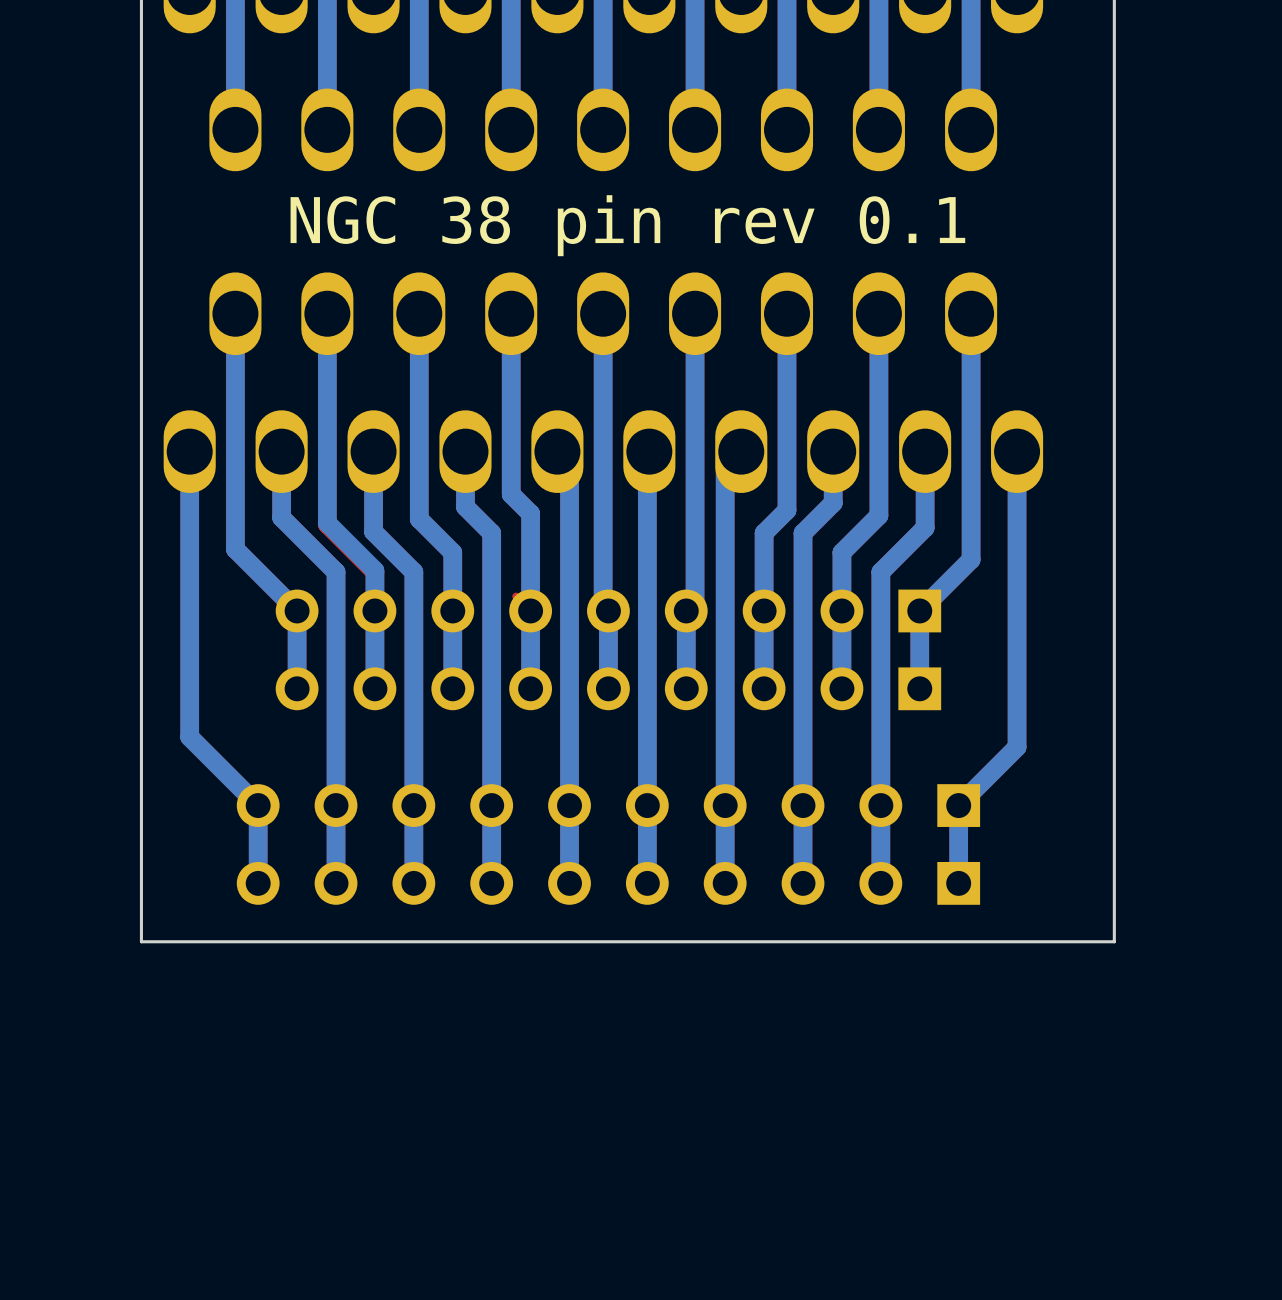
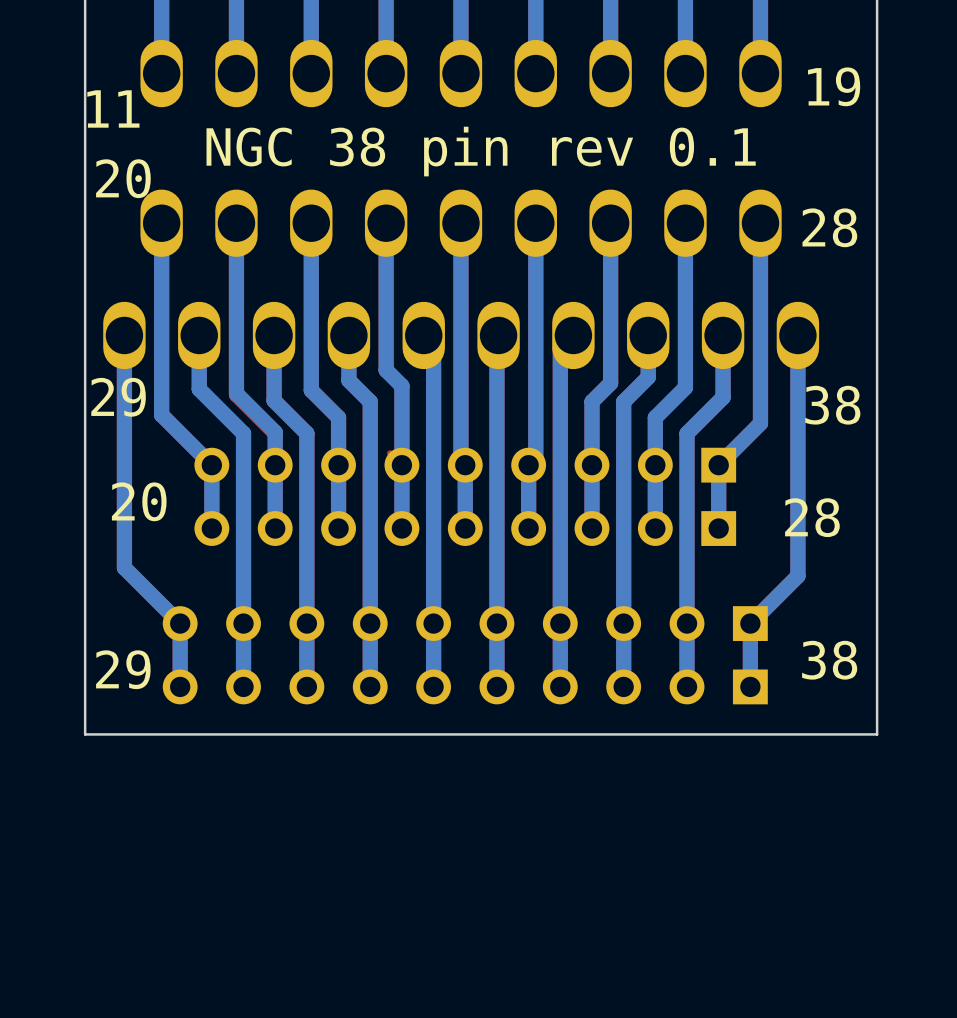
text: none -> 19 (834, 86)
text: none -> 11 (113, 108)
text: none -> 20 (123, 178)
text: none -> 28 (829, 227)
text: none -> 29 (118, 397)
text: none -> 38 (832, 405)
text: none -> 20 (139, 501)
text: none -> 28 (812, 517)
text: none -> 38 (829, 660)
text: none -> 29 (123, 669)

